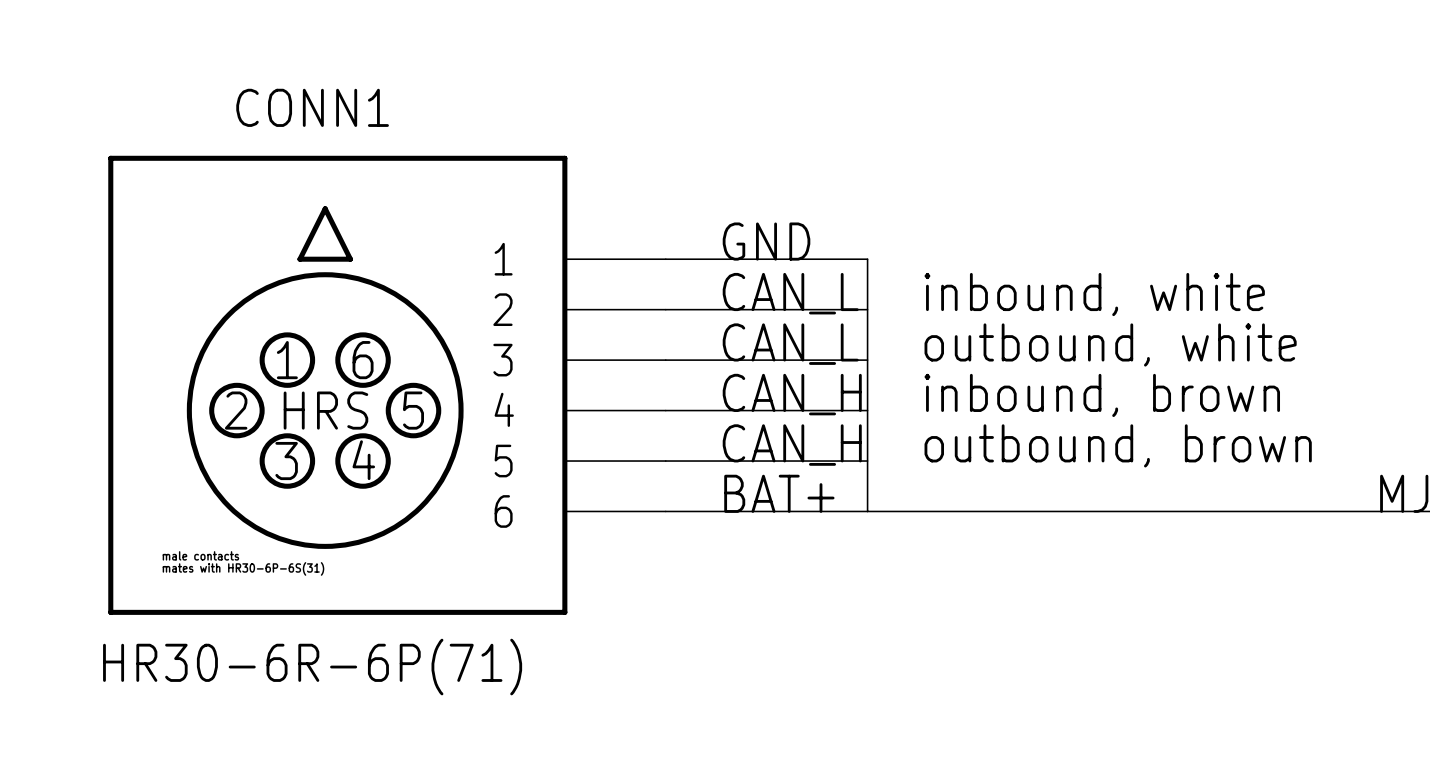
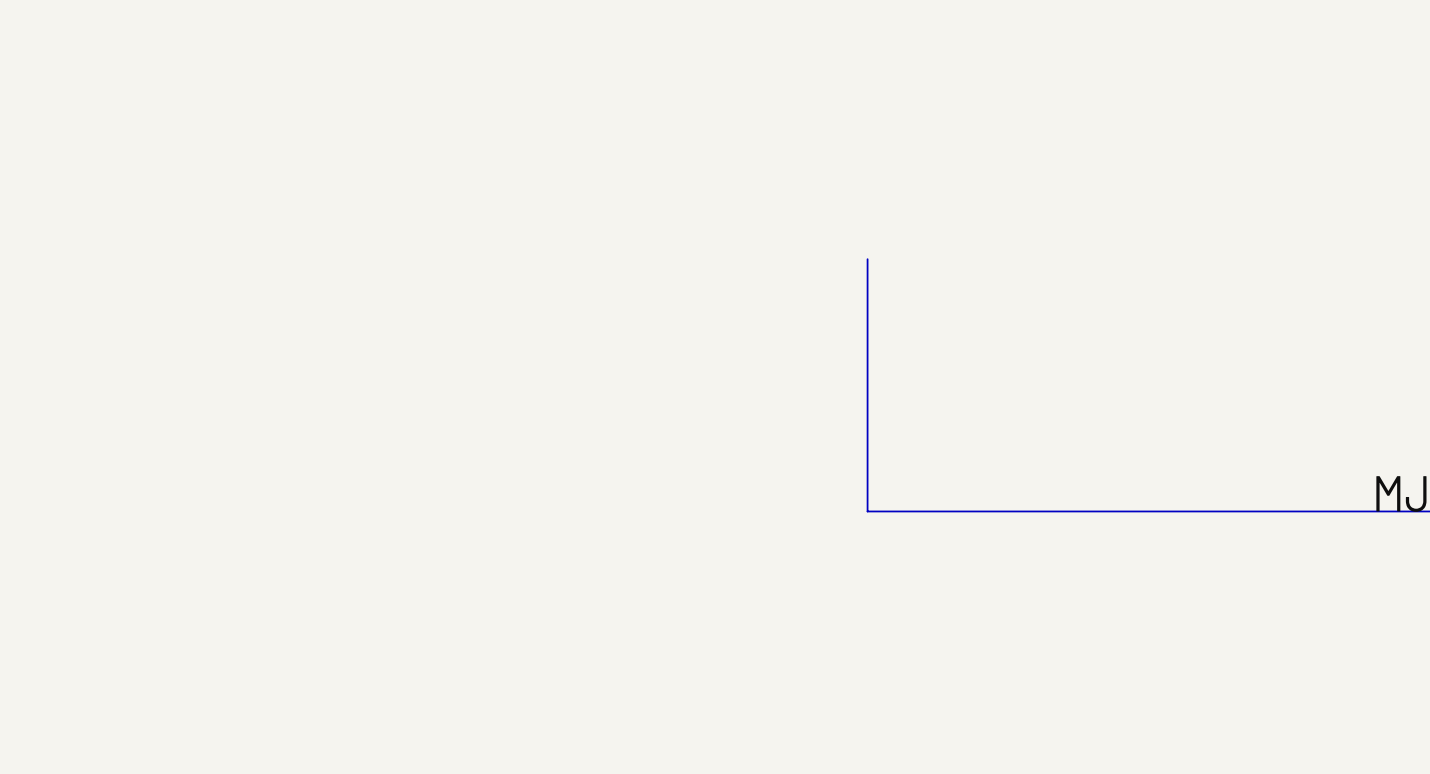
label: GND (766, 241) -> none
wire: (665, 259) (867, 259) -> none
label: CAN_L (790, 293) -> none
text: inbound, white (1094, 294) -> none
wire: (665, 309) (867, 309) -> none
label: CAN_L (790, 344) -> none
text: outbound, white (1110, 344) -> none
wire: (665, 360) (867, 360) -> none
CONN1: HR30-6R-6P(71) (387, 385) -> none
label: CAN_H (792, 394) -> none
text: inbound, brown (1102, 395) -> none
wire: (665, 410) (867, 410) -> none
label: CAN_H (792, 445) -> none
text: outbound, brown (1118, 445) -> none
wire: (665, 461) (867, 461) -> none
label: BAT+ (779, 493) -> none
wire: (665, 511) (867, 511) -> none

